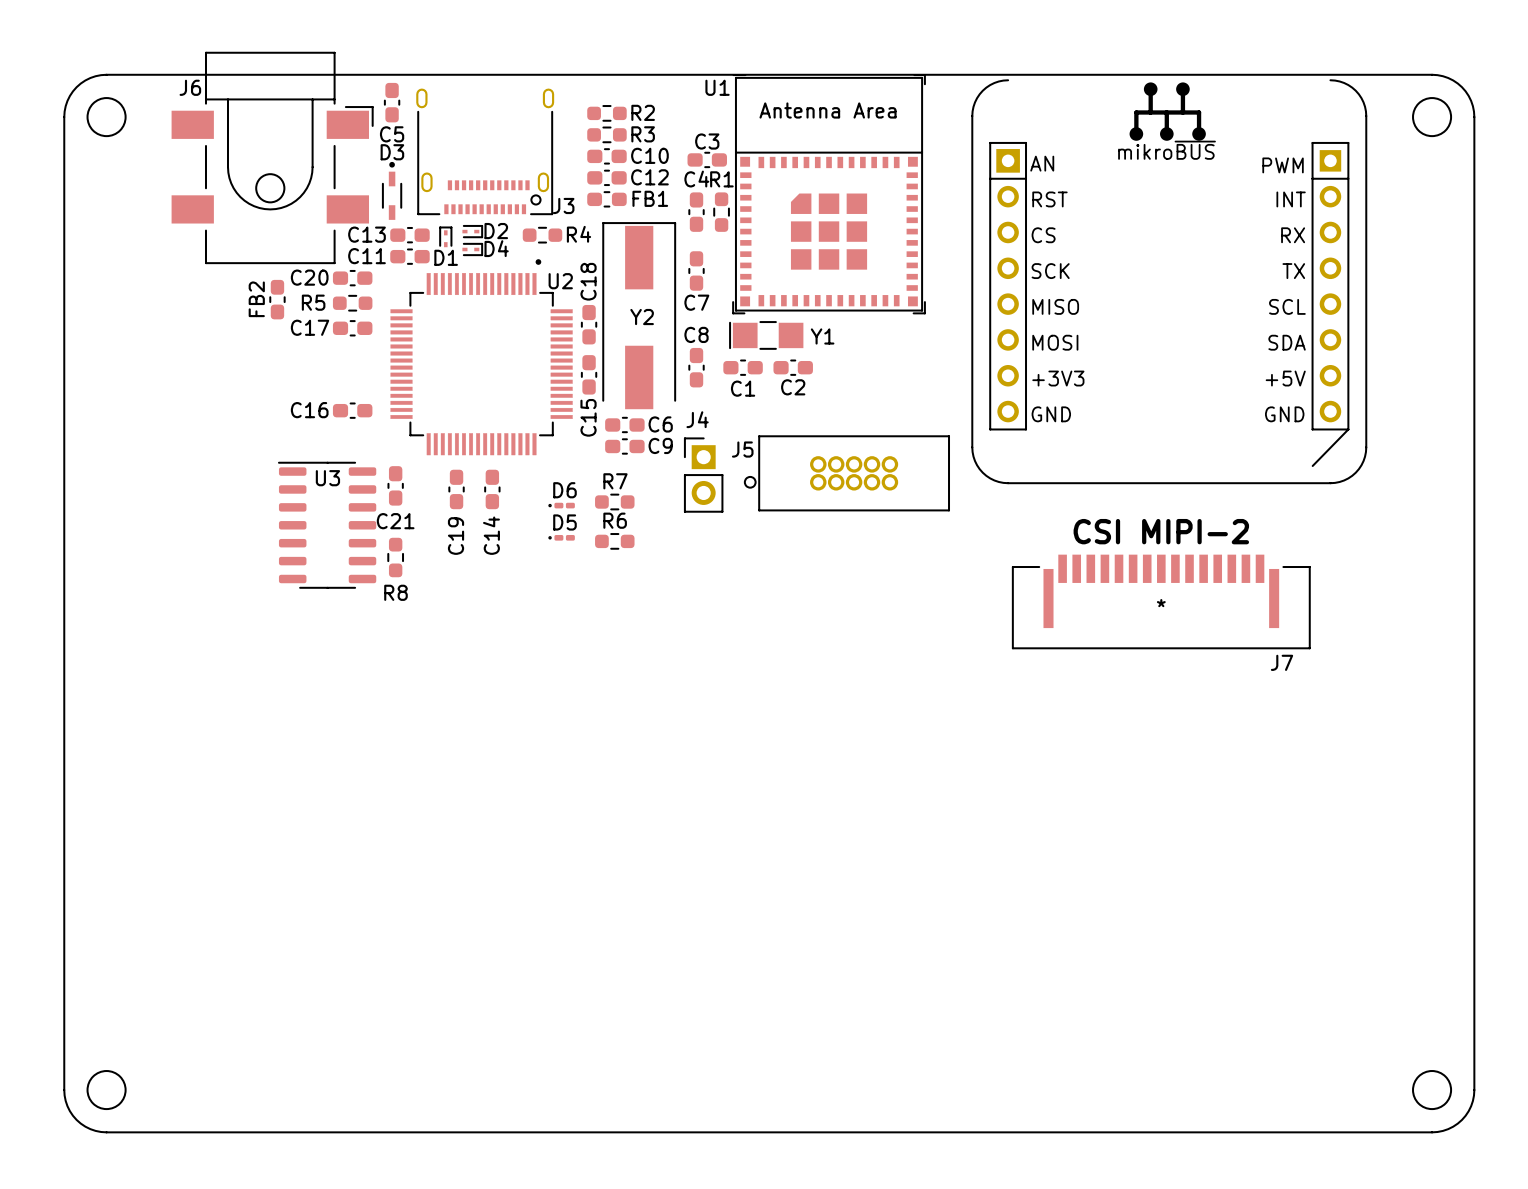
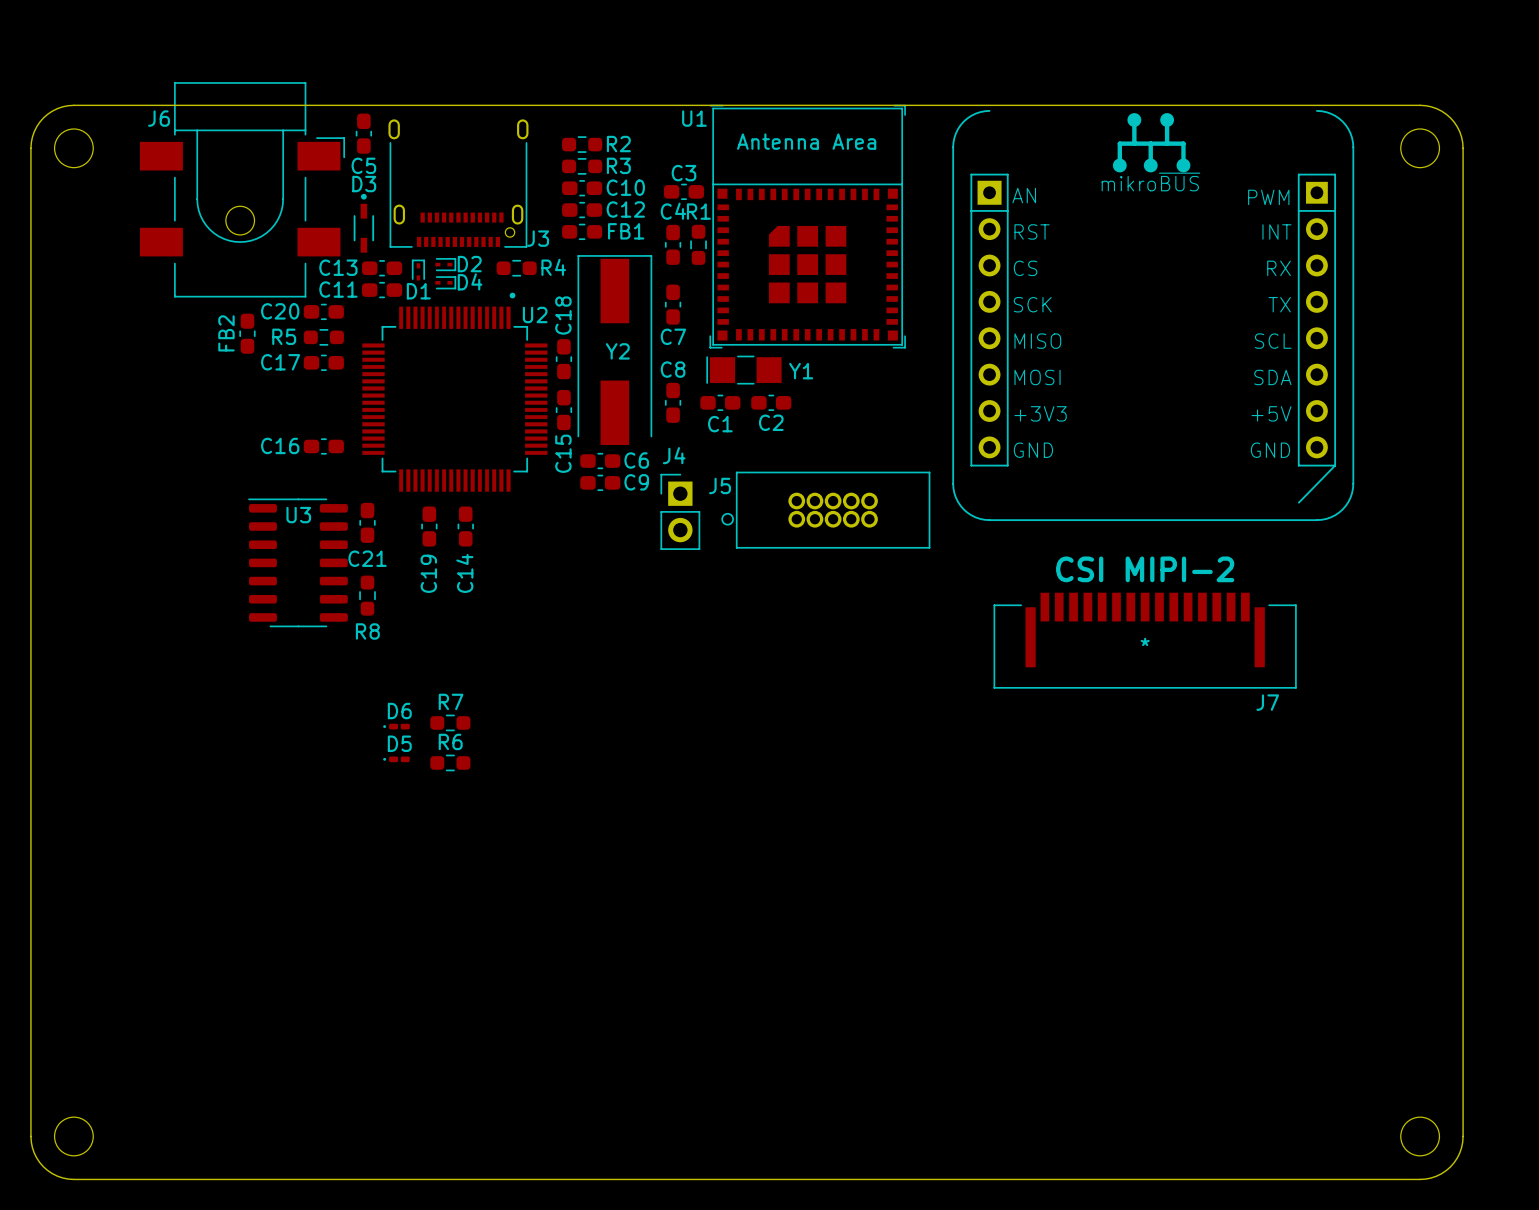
R7 position: (614, 501) -> (450, 722)
D6 position: (561, 505) -> (396, 726)
D5 position: (561, 537) -> (396, 759)
R6 position: (614, 541) -> (450, 762)

